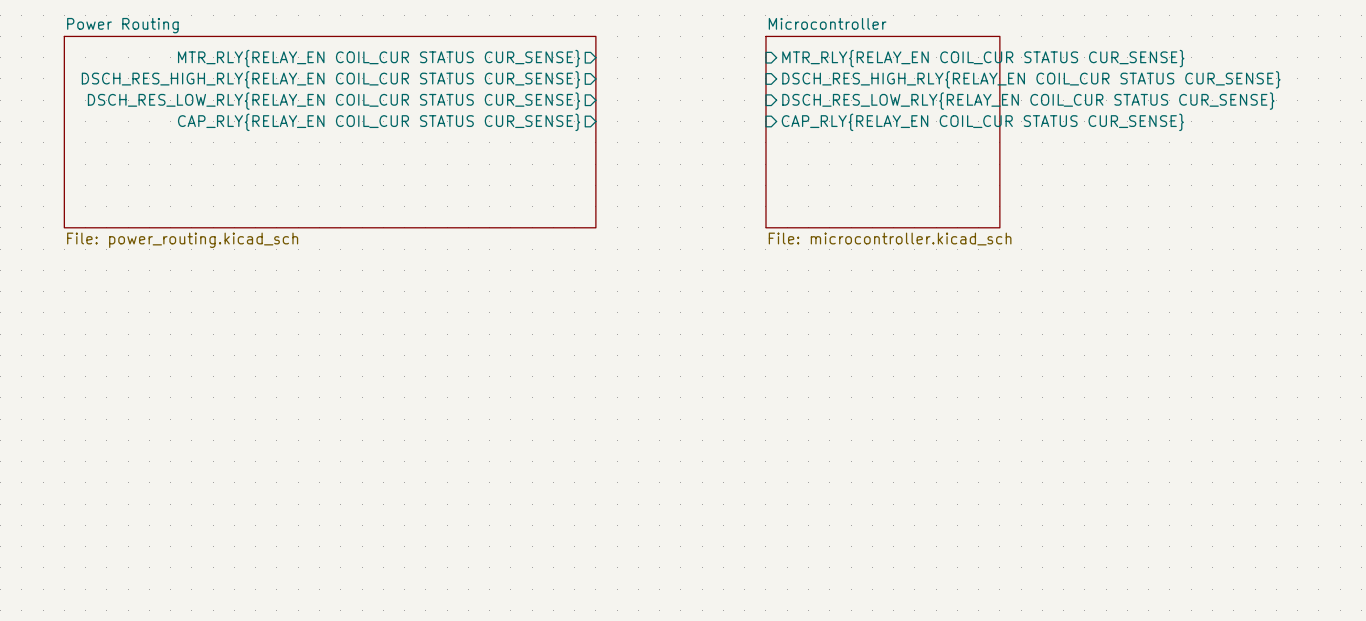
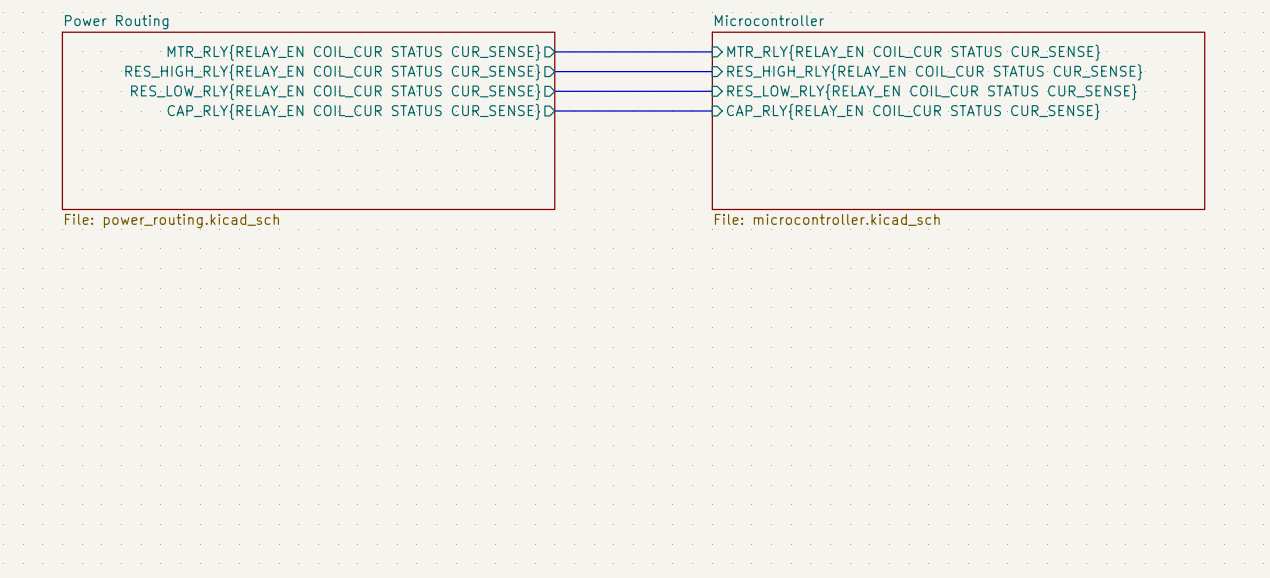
bus: none -> (554, 51) (712, 51)
bus: none -> (554, 71) (712, 71)
sheet pin: DSCH_RES_HIGH_RLY{RELAY_EN COIL_CUR STATUS CUR_SENSE} (330, 79) -> RES_HIGH_RLY{RELAY_EN COIL_CUR STATUS CUR_SENSE} (332, 72)
sheet pin: DSCH_RES_HIGH_RLY{RELAY_EN COIL_CUR STATUS CUR_SENSE} (1031, 79) -> RES_HIGH_RLY{RELAY_EN COIL_CUR STATUS CUR_SENSE} (934, 72)
bus: none -> (554, 91) (712, 91)
sheet pin: DSCH_RES_LOW_RLY{RELAY_EN COIL_CUR STATUS CUR_SENSE} (334, 101) -> RES_LOW_RLY{RELAY_EN COIL_CUR STATUS CUR_SENSE} (335, 92)
sheet pin: DSCH_RES_LOW_RLY{RELAY_EN COIL_CUR STATUS CUR_SENSE} (1028, 101) -> RES_LOW_RLY{RELAY_EN COIL_CUR STATUS CUR_SENSE} (931, 92)
bus: none -> (554, 111) (712, 111)
sheet Microcontroller: File: microcontroller.kicad_sch (882, 132) -> none
sheet Microcontroller: none -> File: microcontroller.kicad_sch (958, 120)

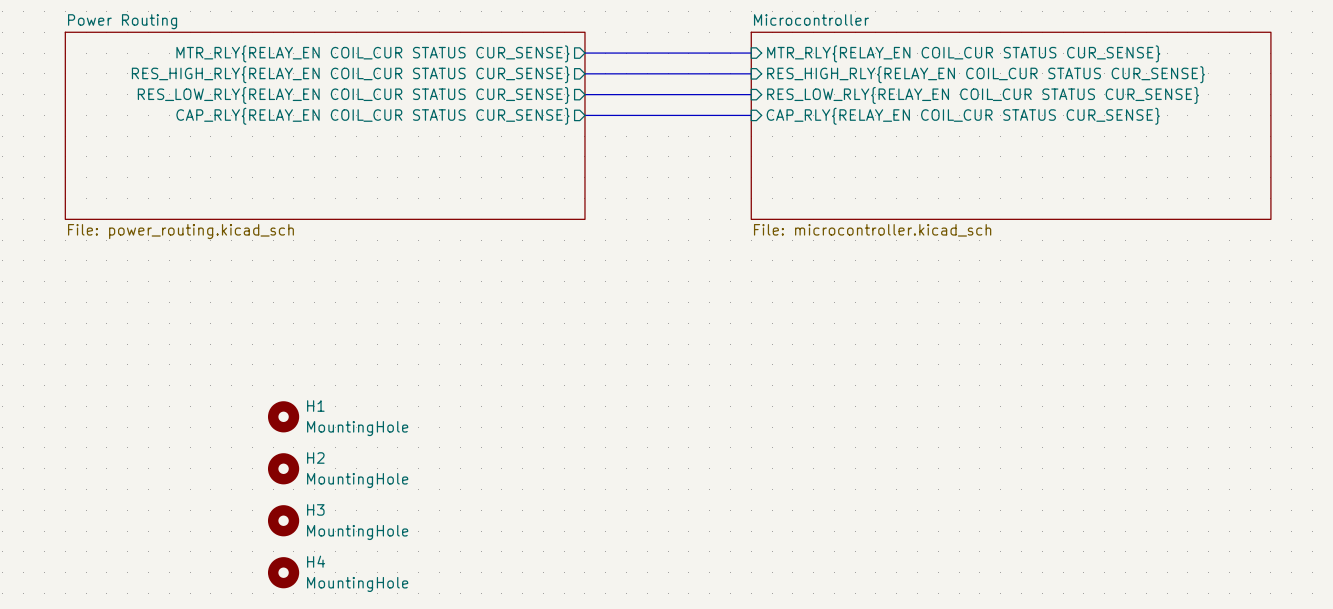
H1: none -> MountingHole (283, 416)
H2: none -> MountingHole (283, 468)
H3: none -> MountingHole (283, 520)
H4: none -> MountingHole (283, 572)

